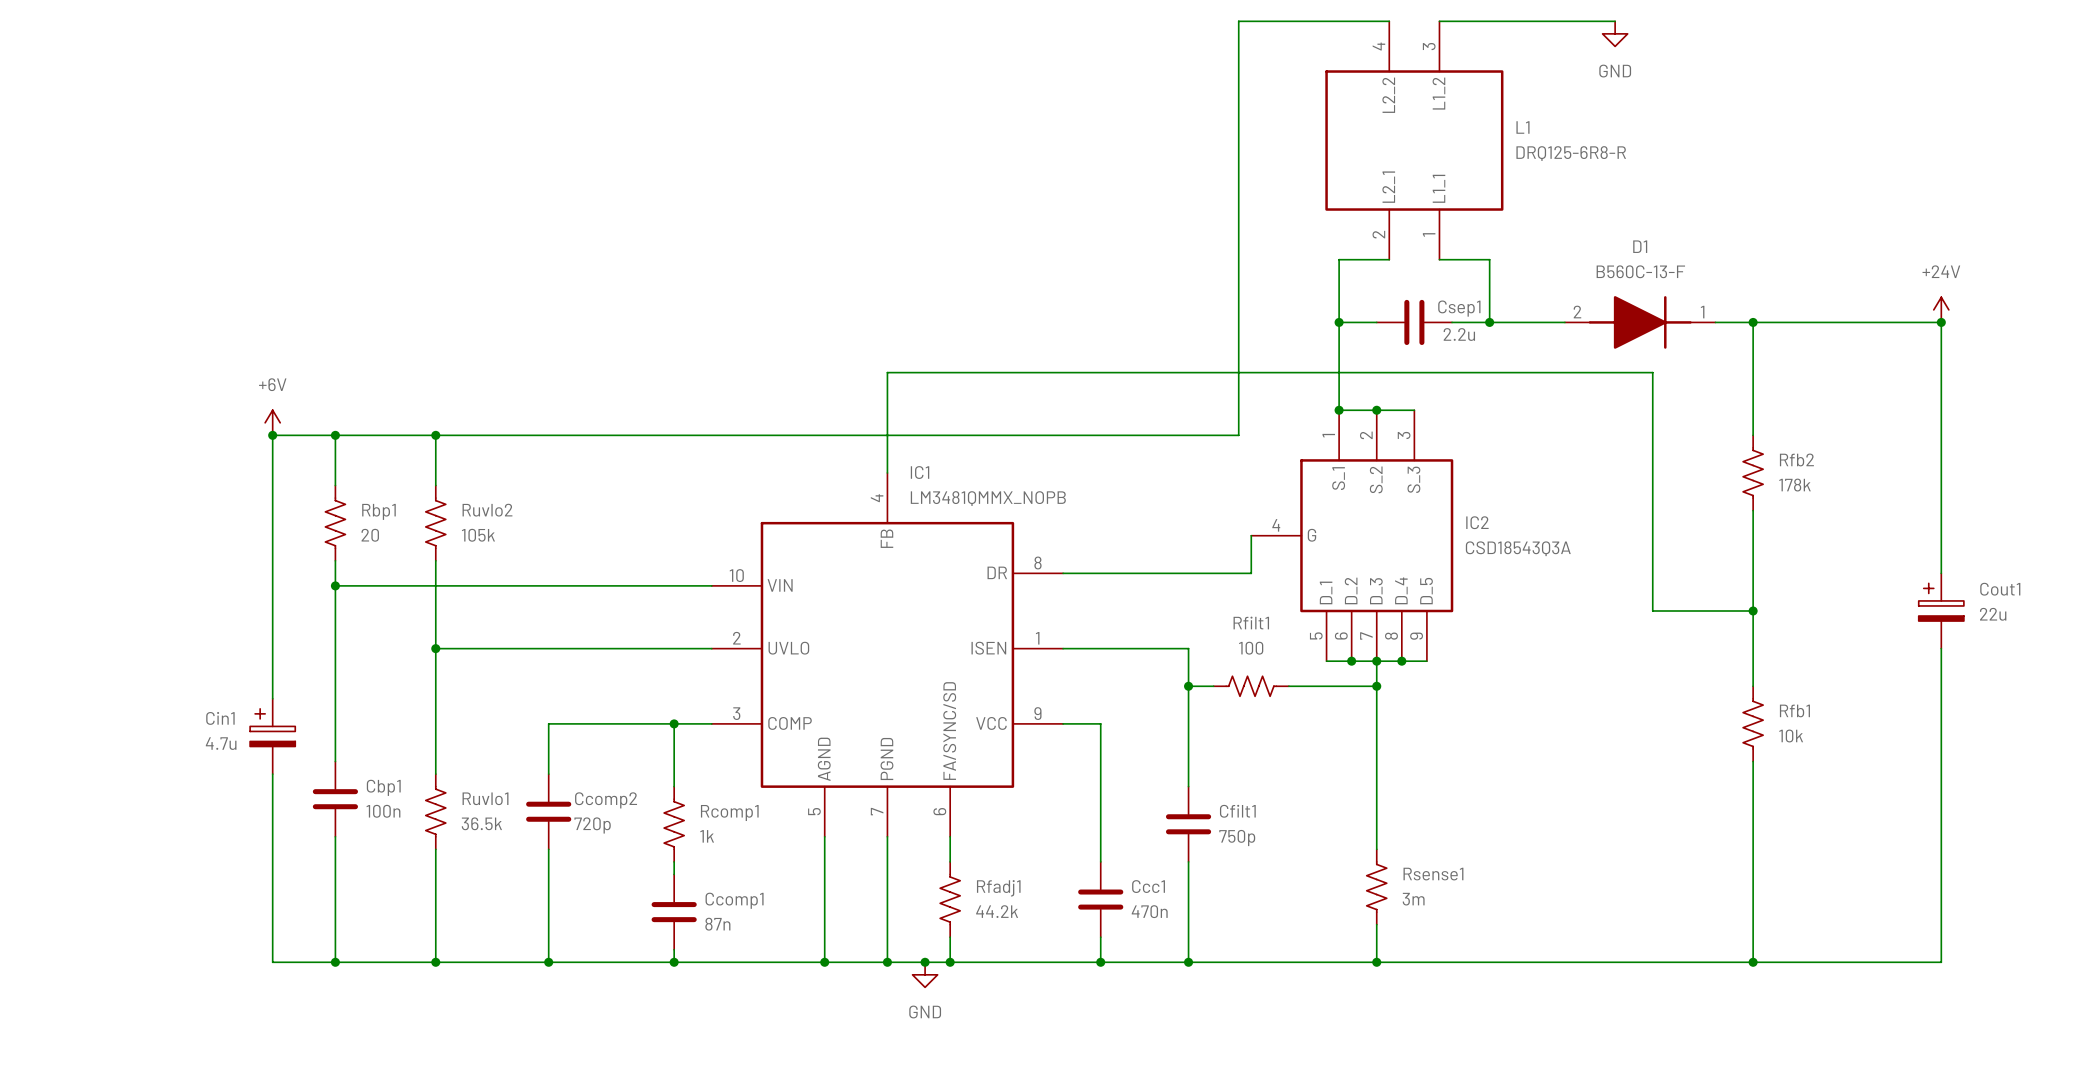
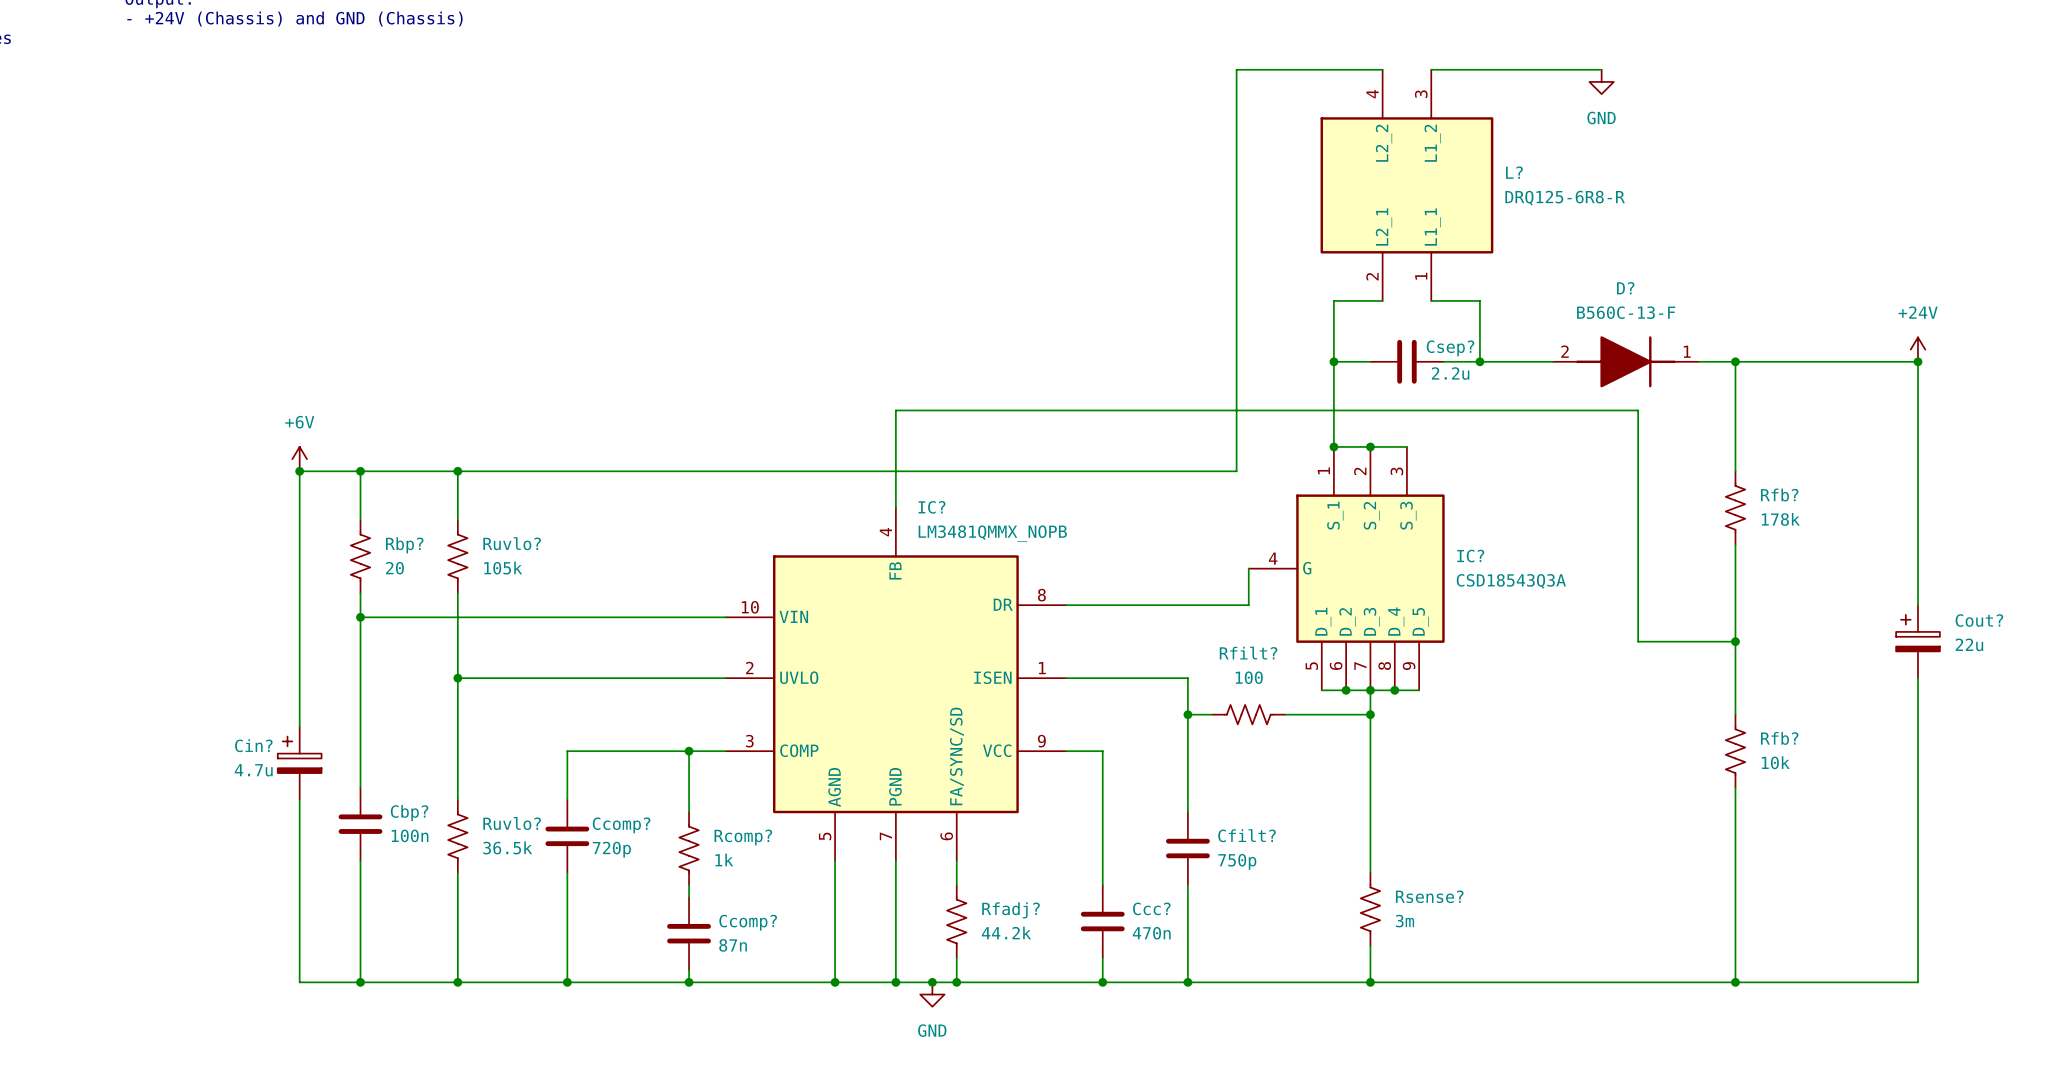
L1 name: L1 (1522, 127) -> L? (1514, 172)
D1 name: D1 (1640, 246) -> D? (1625, 288)
Csep1 name: Csep1 (1459, 308) -> Csep? (1450, 348)
Rfb2 name: Rfb2 (1796, 459) -> Rfb? (1779, 495)
IC1 name: IC1 (920, 472) -> IC? (932, 507)
Ruvlo2 name: Ruvlo2 (487, 510) -> Ruvlo? (512, 543)
Rbp1 name: Rbp1 (378, 511) -> Rbp? (404, 545)
IC2 name: IC2 (1477, 522) -> IC? (1470, 556)
Cout1 name: Cout1 (2000, 589) -> Cout? (1979, 620)
Rfilt1 name: Rfilt1 (1251, 622) -> Rfilt? (1248, 653)
Rfb1 name: Rfb1 (1794, 710) -> Rfb? (1779, 738)
Cin1 name: Cin1 (220, 718) -> Cin? (253, 745)
Cbp1 name: Cbp1 (383, 787) -> Cbp? (409, 813)
Ruvlo1 name: Ruvlo1 (485, 798) -> Ruvlo? (512, 823)
Ccomp2 name: Ccomp2 (606, 800) -> Ccomp? (621, 825)
Cfilt1 name: Cfilt1 (1237, 811) -> Cfilt? (1247, 835)
Rcomp1 name: Rcomp1 (729, 813) -> Rcomp? (743, 837)
Rsense1 name: Rsense1 (1433, 874) -> Rsense? (1429, 896)
Ccc1 name: Ccc1 (1148, 886) -> Ccc? (1151, 908)
Rfadj1 name: Rfadj1 (998, 888) -> Rfadj? (1011, 910)
Ccomp1 name: Ccomp1 (734, 900) -> Ccomp? (748, 922)

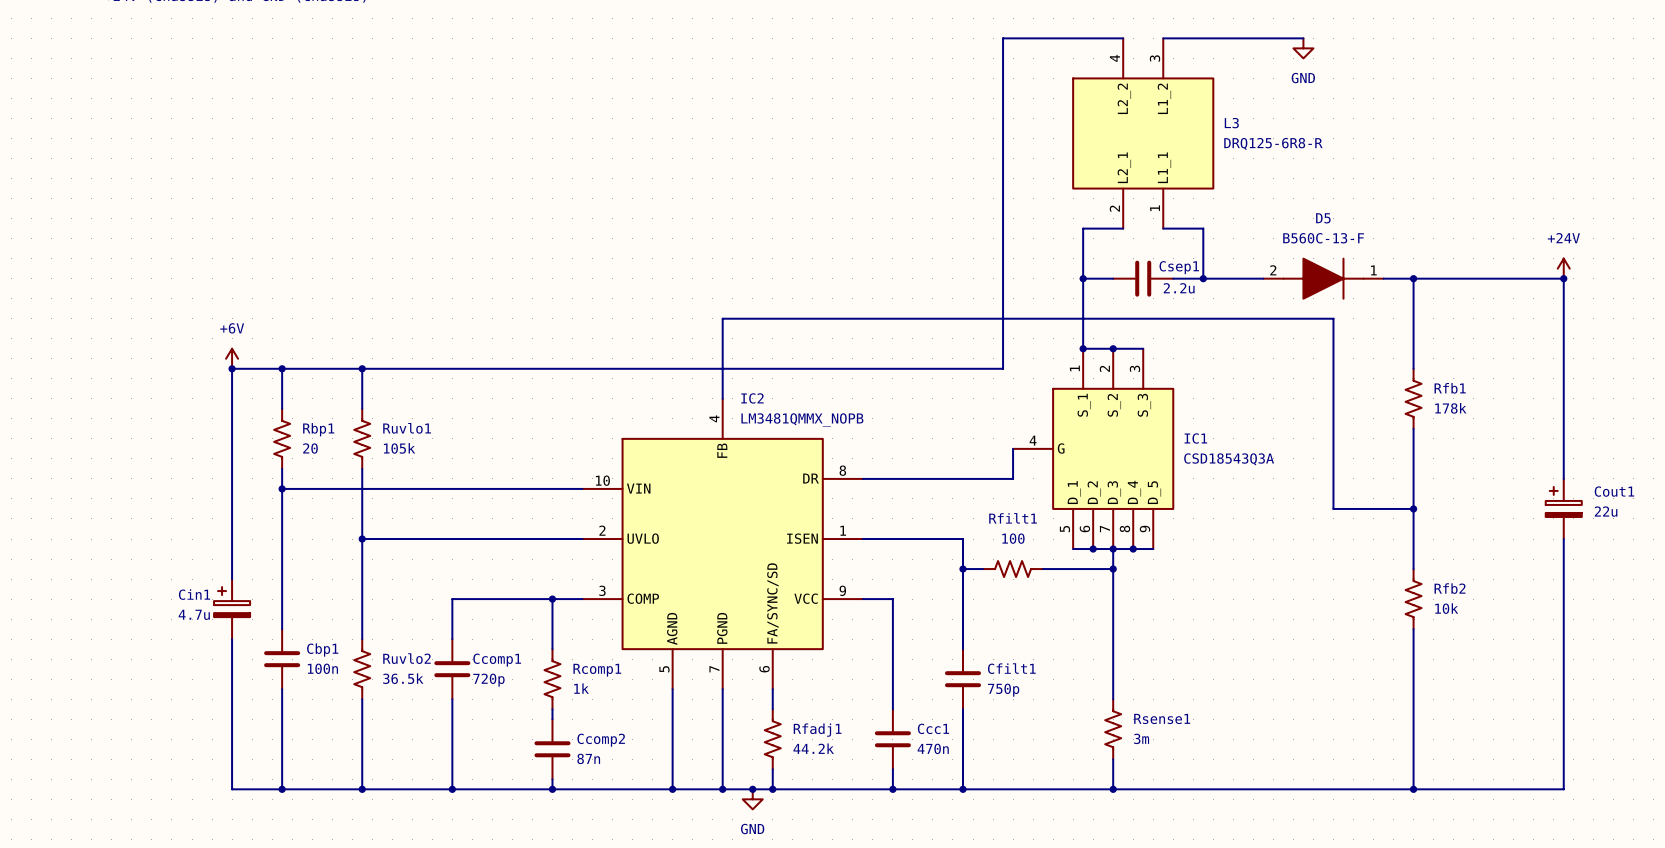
L? name: L? (1514, 172) -> L3 (1231, 123)
D? name: D? (1625, 288) -> D5 (1323, 218)
Csep? name: Csep? (1450, 348) -> Csep1 (1179, 267)
Rfb? name: Rfb? (1779, 495) -> Rfb1 (1450, 388)
IC? name: IC? (932, 507) -> IC2 (752, 398)
Ruvlo? name: Ruvlo? (512, 543) -> Ruvlo1 (407, 428)
Rbp? name: Rbp? (404, 545) -> Rbp1 (318, 429)
IC? name: IC? (1470, 556) -> IC1 (1195, 438)
Cout? name: Cout? (1979, 620) -> Cout1 (1614, 491)
Rfilt? name: Rfilt? (1248, 653) -> Rfilt1 (1013, 518)
Rfb? name: Rfb? (1779, 738) -> Rfb2 (1450, 588)
Cin? name: Cin? (253, 745) -> Cin1 (194, 594)
Cbp? name: Cbp? (409, 813) -> Cbp1 (322, 649)
Ruvlo? name: Ruvlo? (512, 823) -> Ruvlo2 (406, 658)
Ccomp? name: Ccomp? (621, 825) -> Ccomp1 (497, 660)
Cfilt? name: Cfilt? (1247, 835) -> Cfilt1 (1011, 668)
Rcomp? name: Rcomp? (743, 837) -> Rcomp1 (597, 670)
Rsense? name: Rsense? (1429, 896) -> Rsense1 (1162, 718)
Ccc? name: Ccc? (1151, 908) -> Ccc1 (933, 728)
Rfadj? name: Rfadj? (1011, 910) -> Rfadj1 (817, 730)
Ccomp? name: Ccomp? (748, 922) -> Ccomp2 (601, 740)

